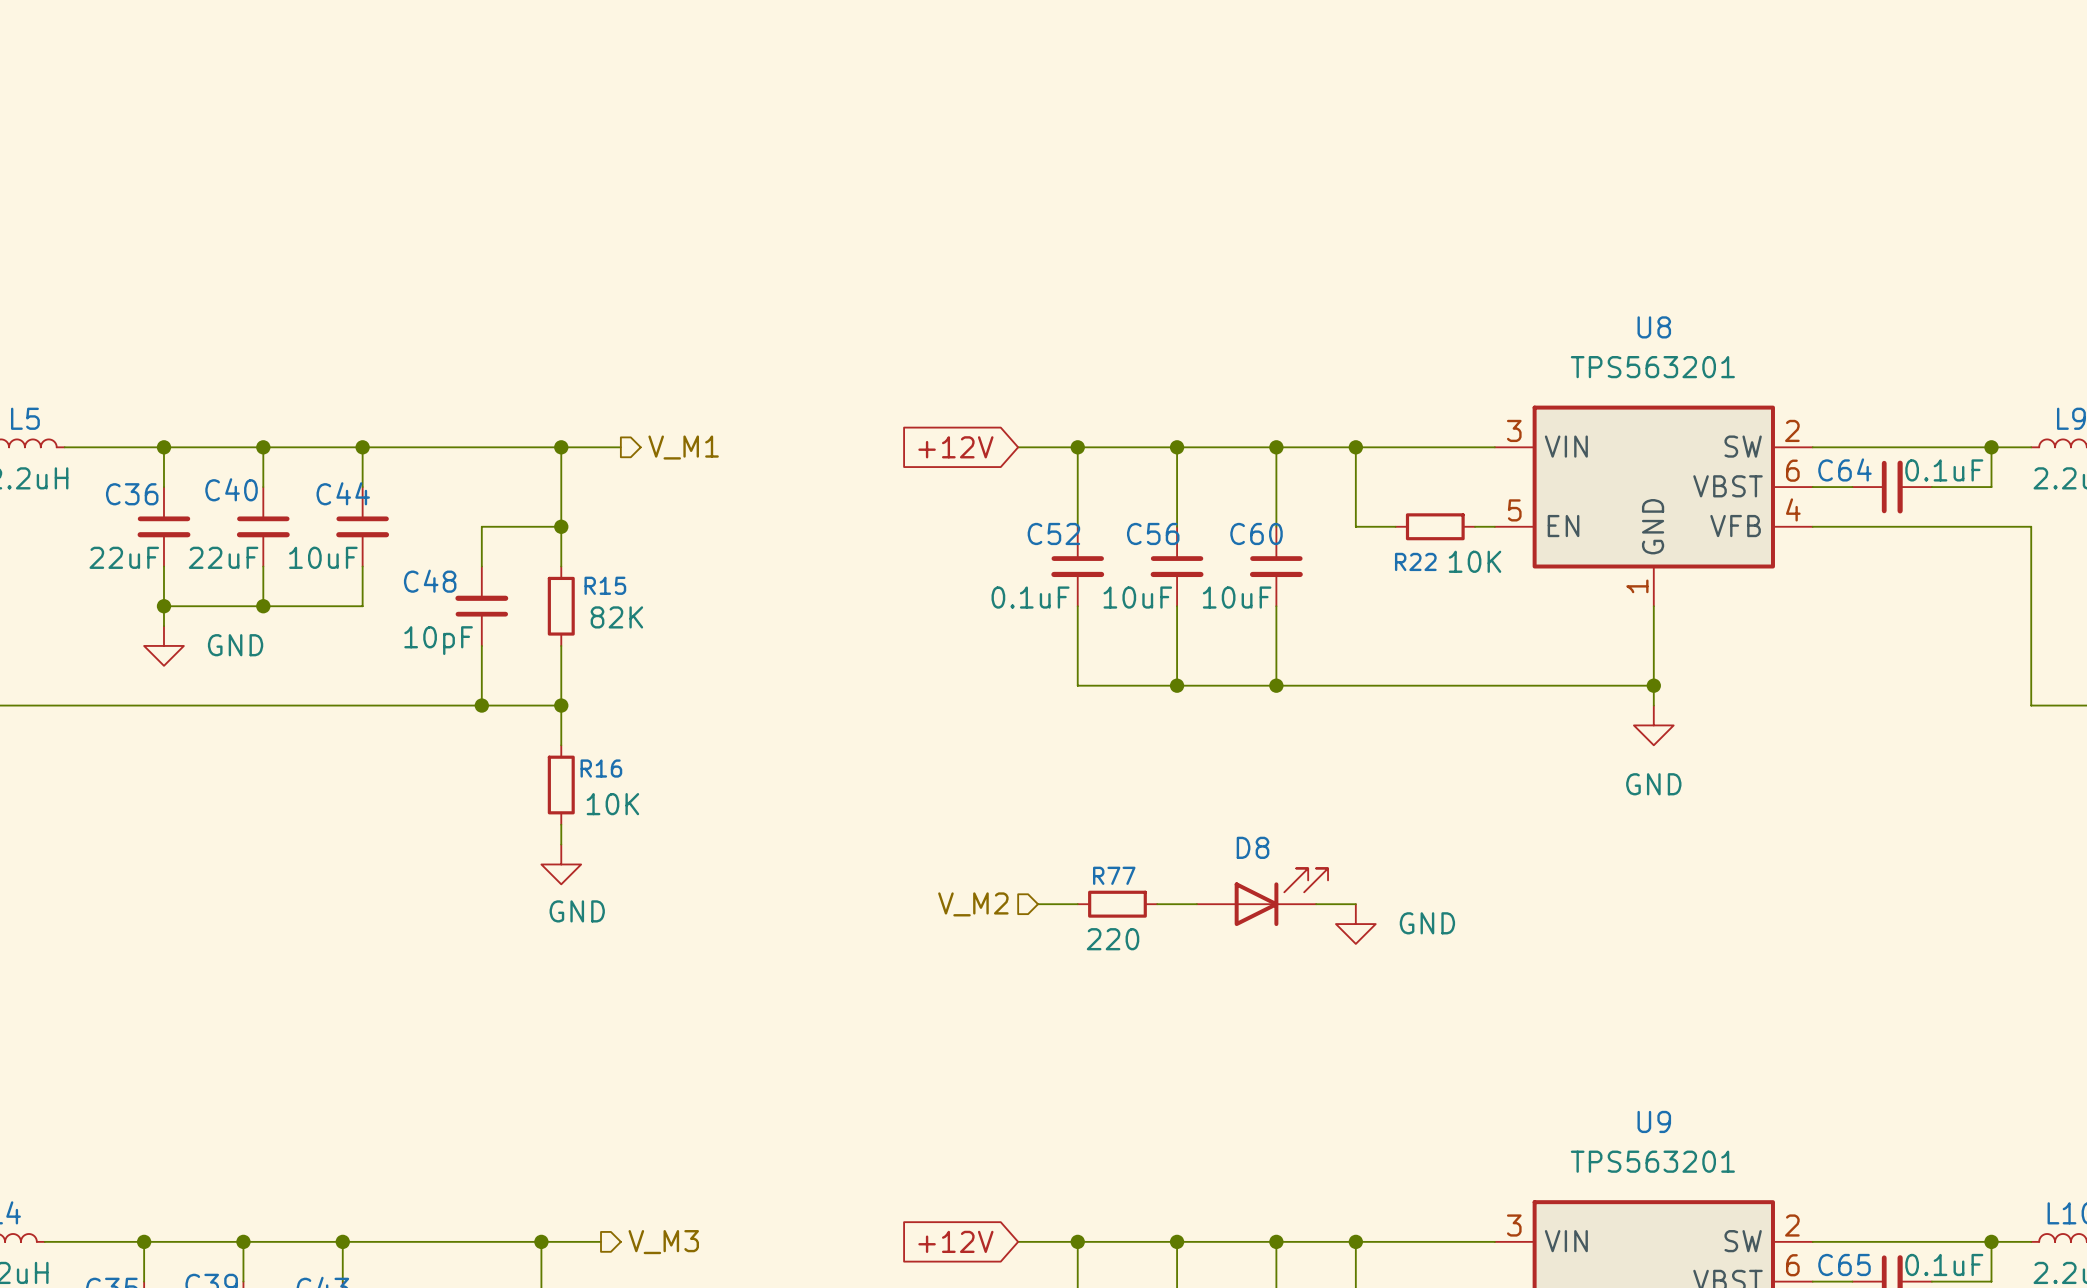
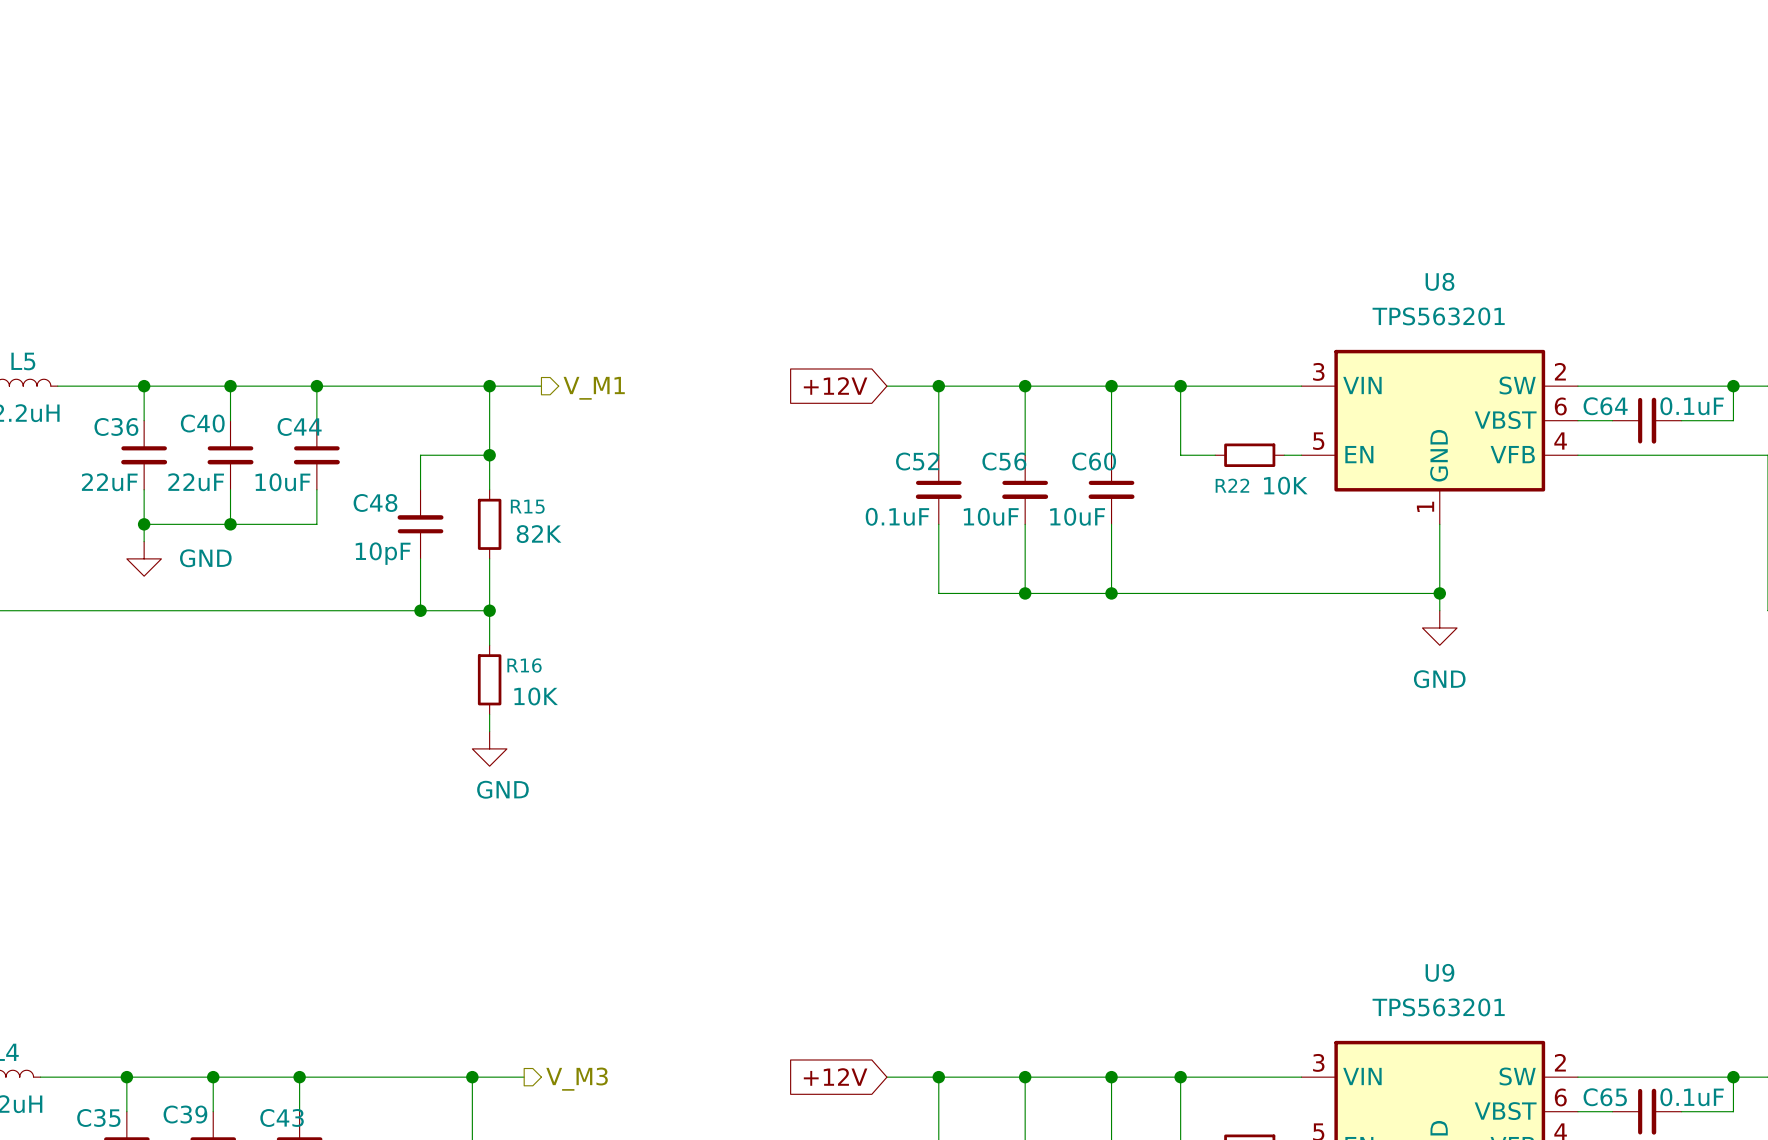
D8: (1262, 897) -> none
hierarchical label: V_M2 (973, 904) -> none
wire: (1038, 904) (1077, 904) -> none
R77: 220 (1117, 904) -> none
wire: (1157, 904) (1196, 904) -> none
wire: (1316, 904) (1355, 904) -> none
power symbol: GND (1355, 924) -> none

